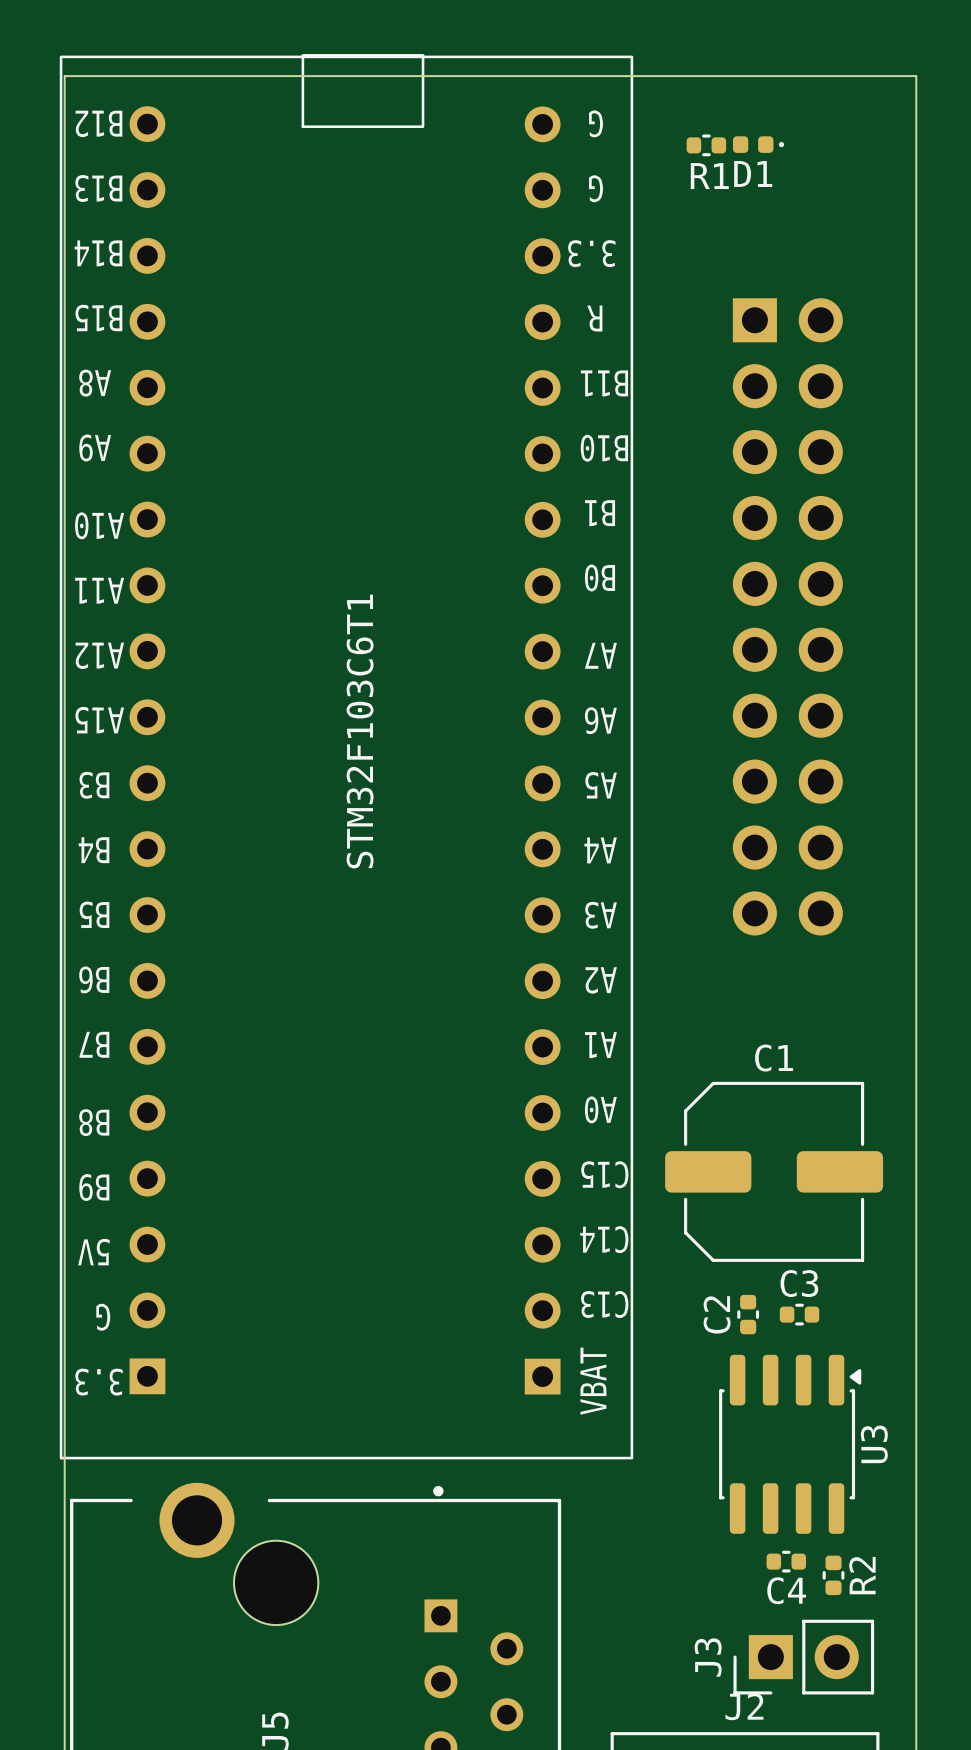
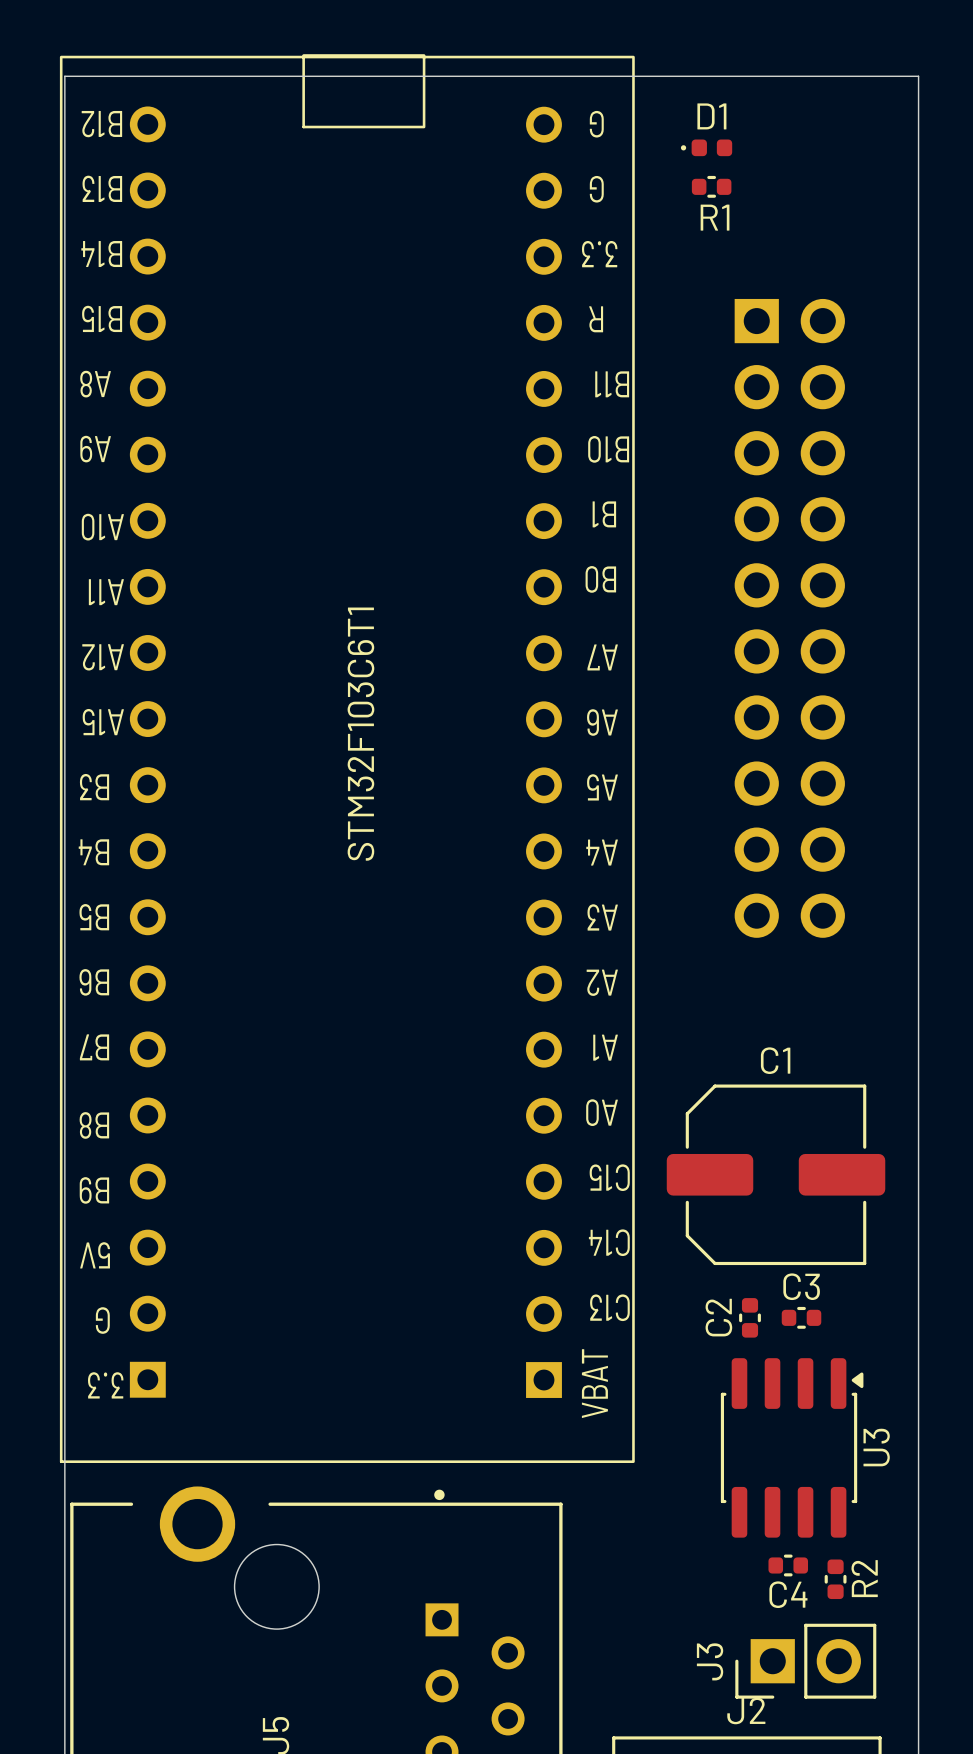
D1 rotation: 0° (758, 144) -> 180° (706, 147)
D1 position: (758, 144) -> (706, 147)
R1 position: (706, 145) -> (711, 186)

